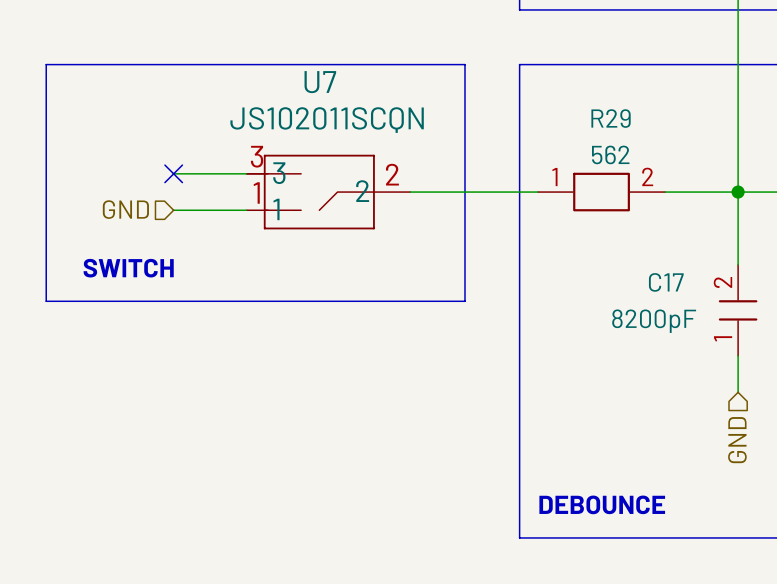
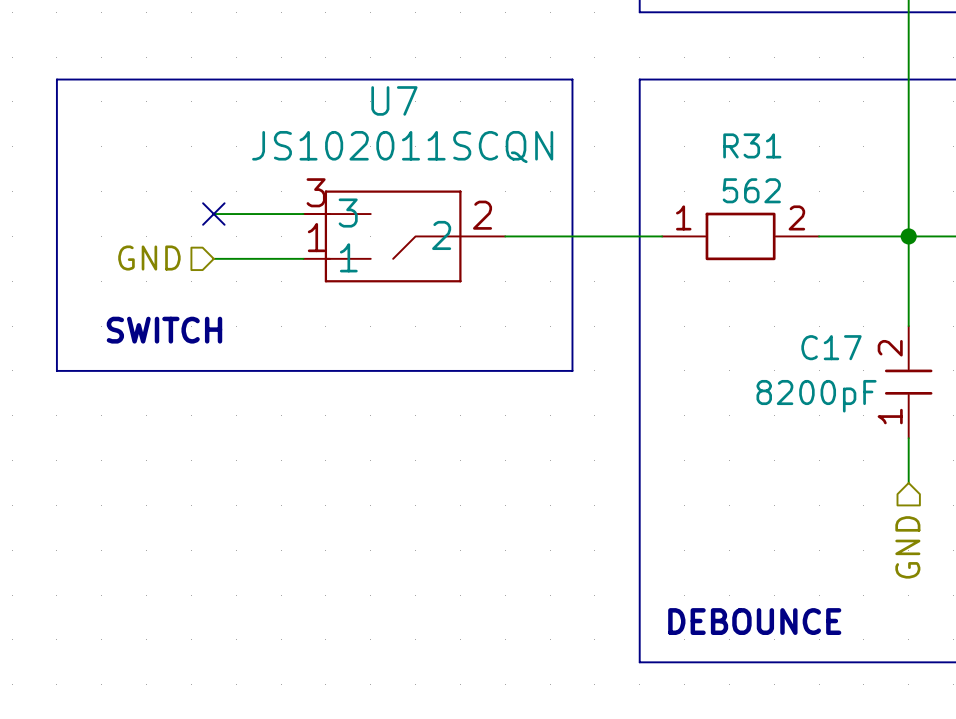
R29 name: R29 (611, 118) -> R31 (752, 145)

